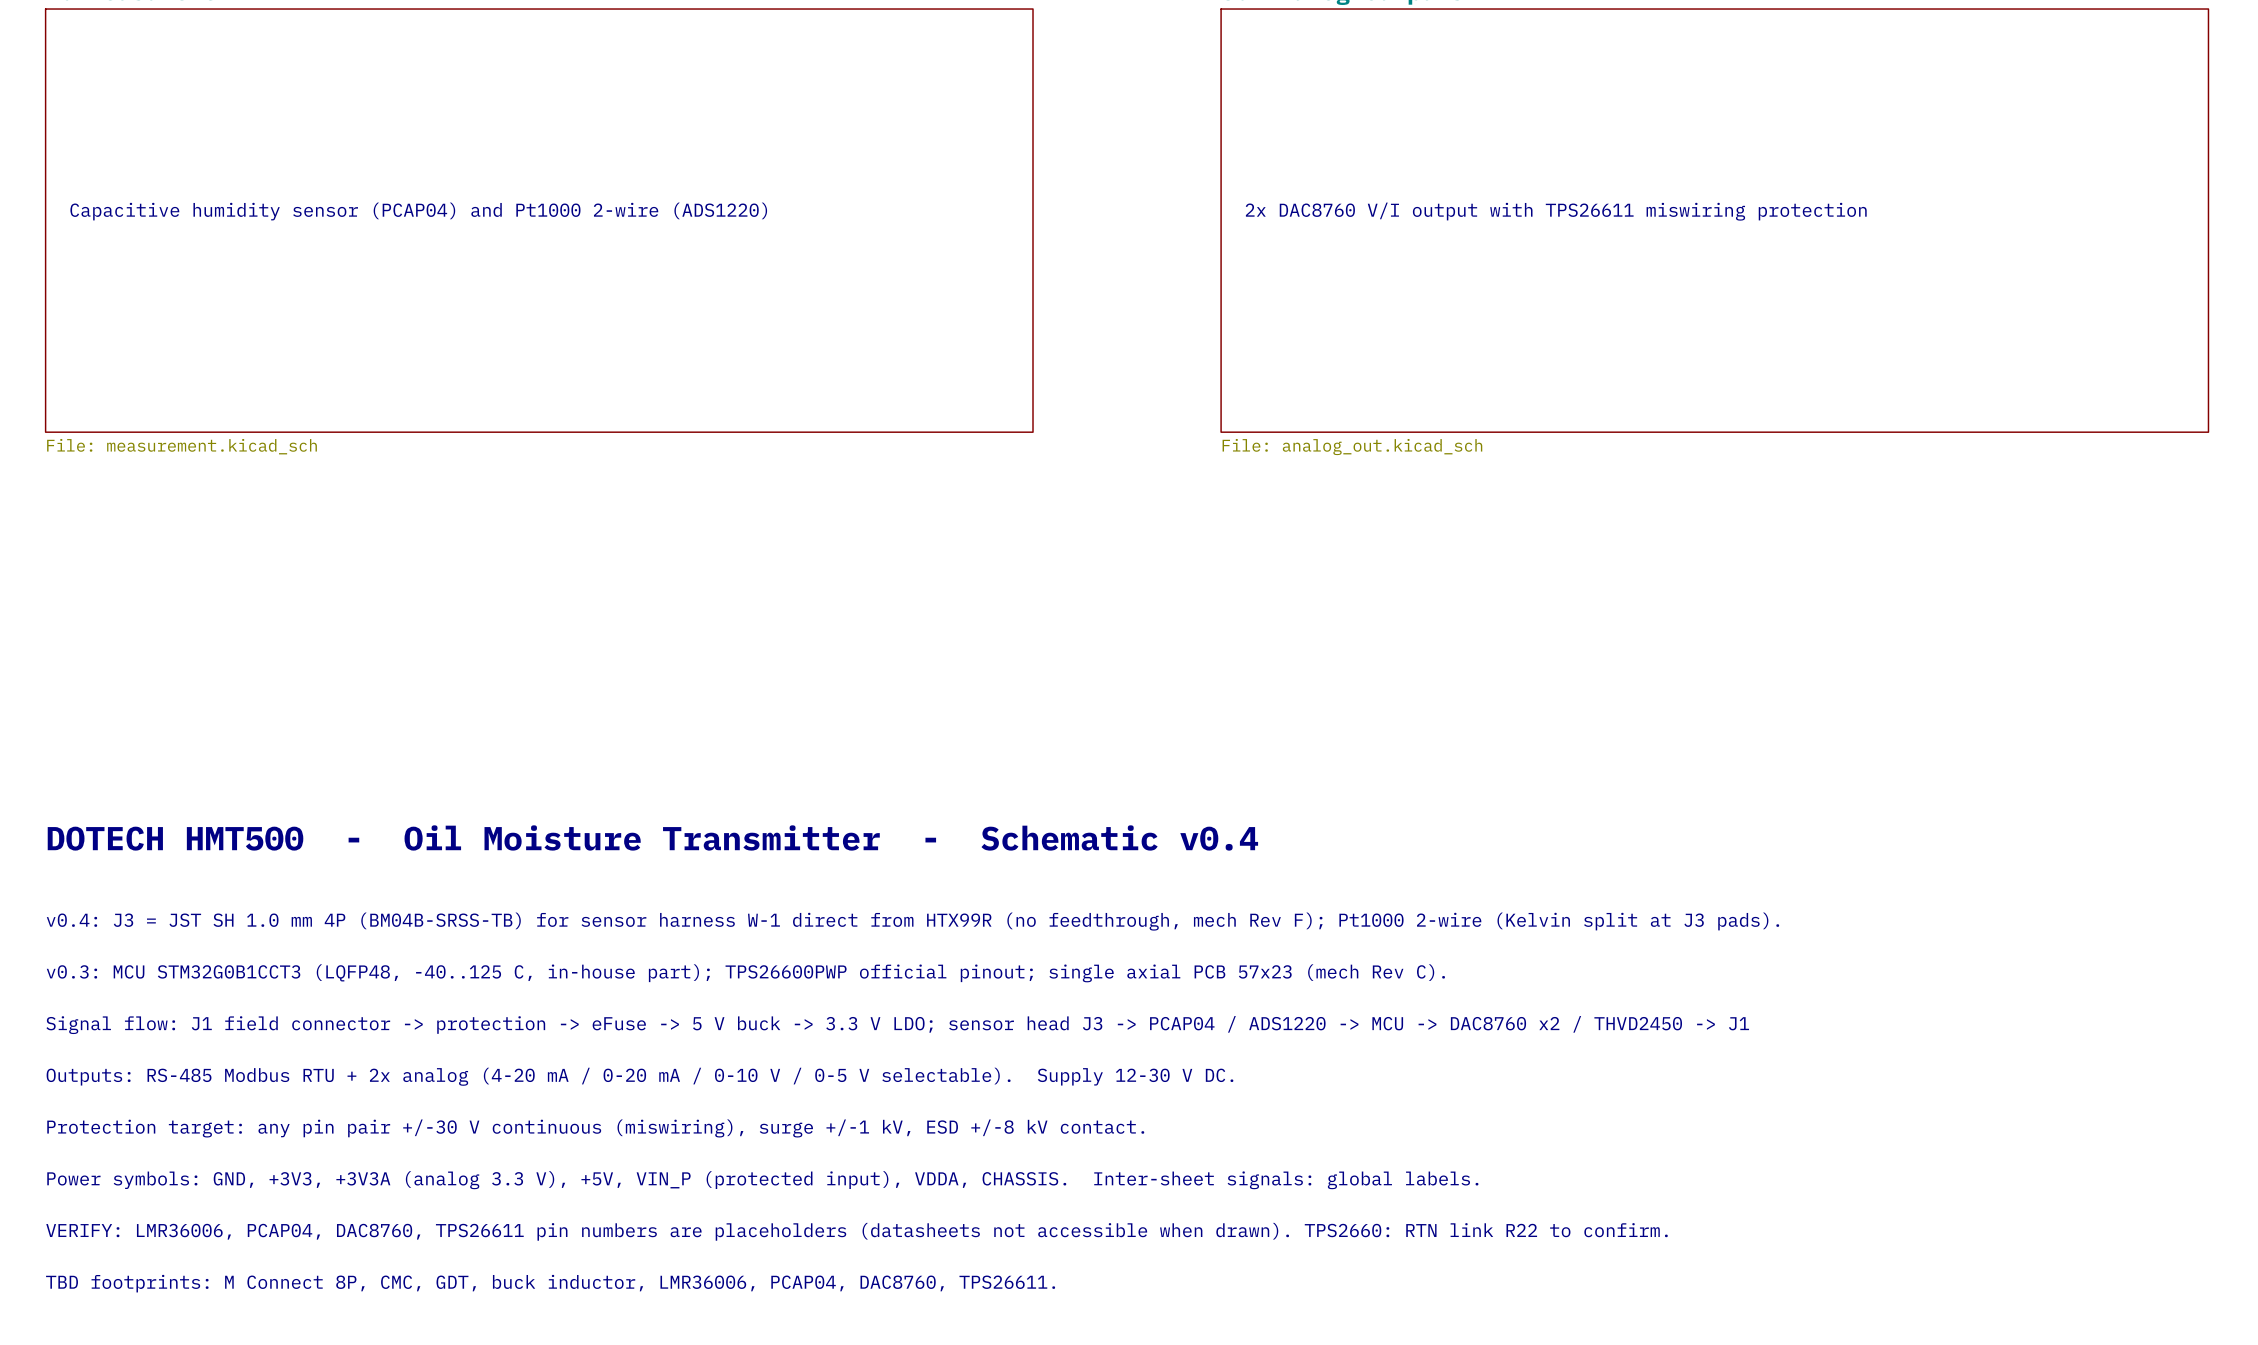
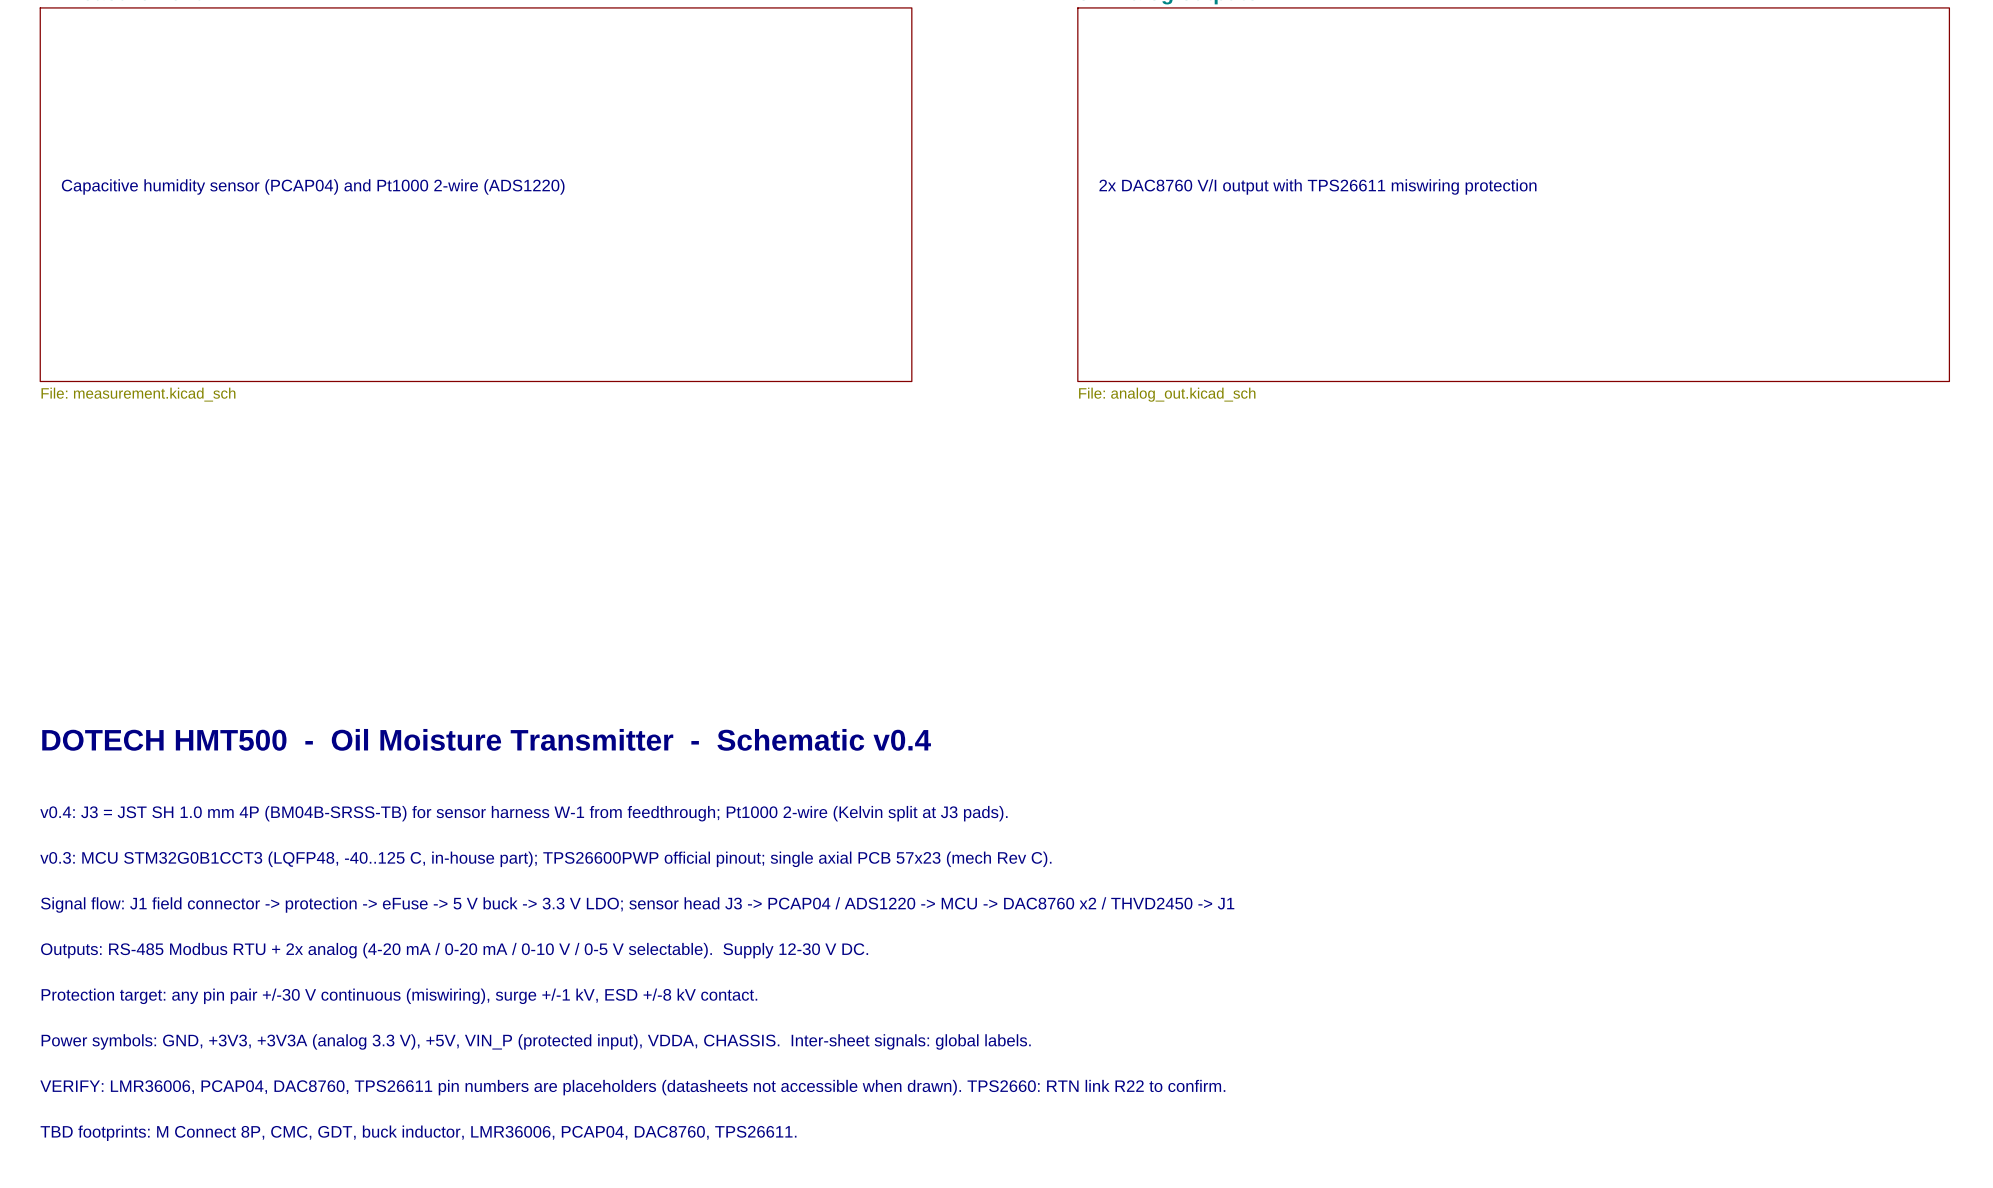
text: v0.4: J3 = JST SH 1.0 mm 4P (BM04B-SRSS-TB) for sensor harness W-1 direct from HTX99R (no feedthrough, mech Rev F); Pt1000 2-wire (Kelvin split at J3 pads). (912, 921) -> v0.4: J3 = JST SH 1.0 mm 4P (BM04B-SRSS-TB) for sensor harness W-1 from feedthrough; Pt1000 2-wire (Kelvin split at J3 pads). (523, 813)

